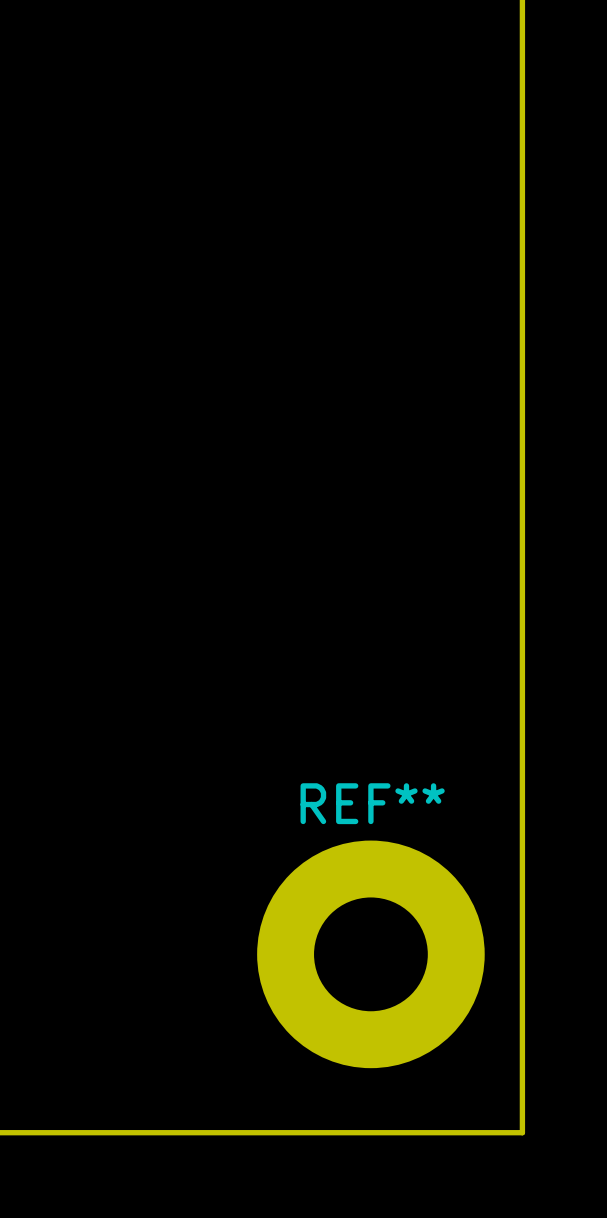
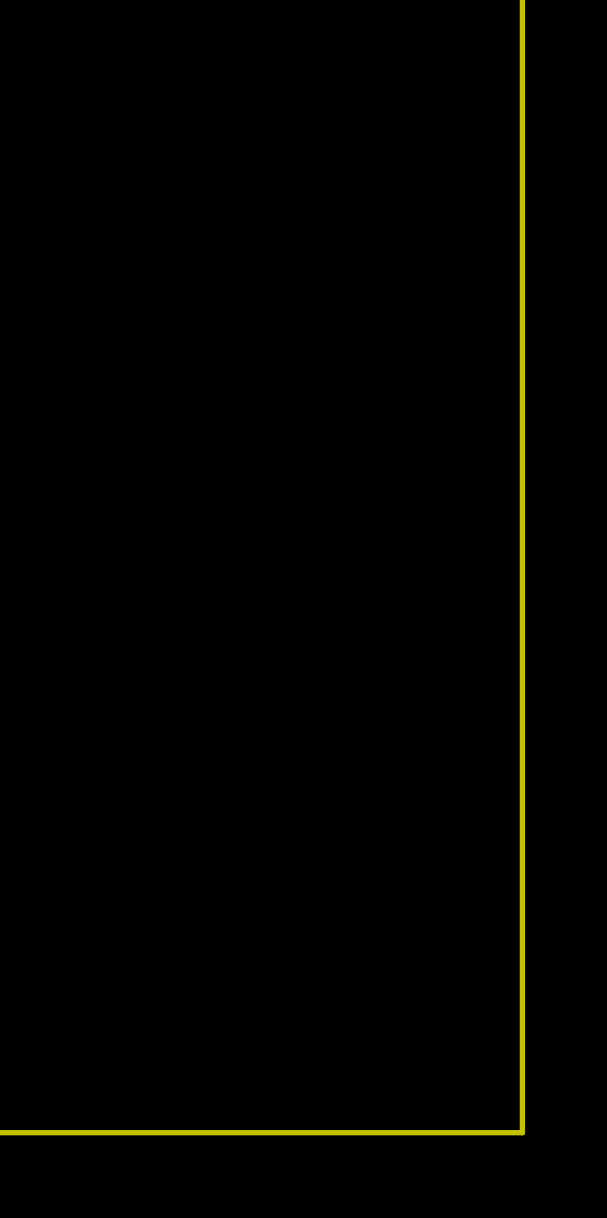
REF**: (370, 954) -> none

